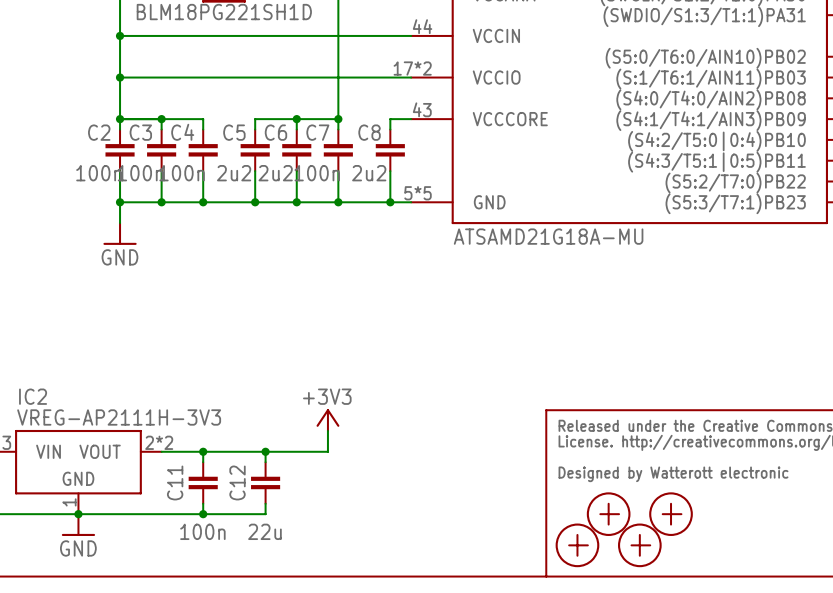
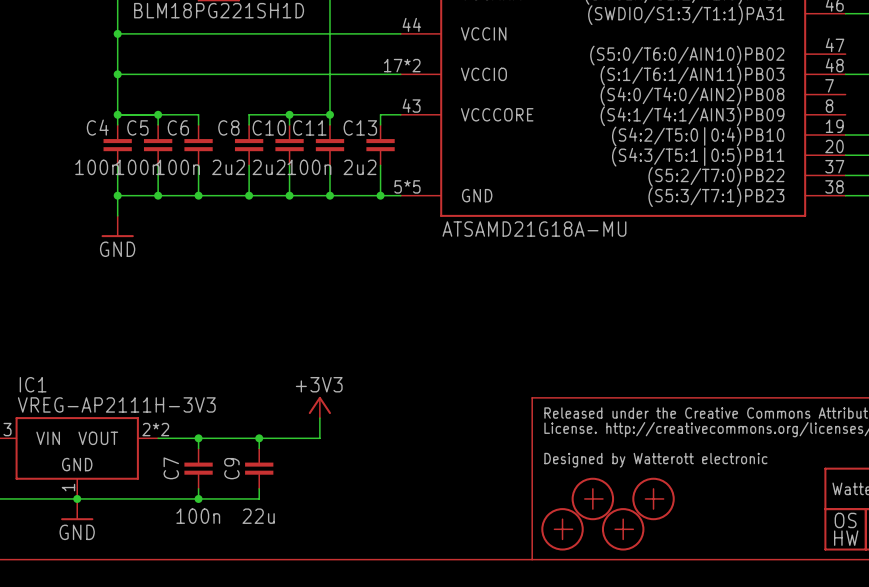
C2 name: C2 (99, 132) -> C4 (97, 127)
C3 name: C3 (140, 132) -> C5 (137, 127)
C4 name: C4 (182, 132) -> C6 (178, 127)
C5 name: C5 (234, 132) -> C8 (228, 127)
C6 name: C6 (275, 132) -> C10 (269, 127)
C7 name: C7 (317, 132) -> C11 (309, 127)
C8 name: C8 (369, 132) -> C13 (360, 127)
IC2 name: IC2 (33, 396) -> IC1 (33, 384)
C11 name: C11 (175, 482) -> C7 (171, 468)
C12 name: C12 (237, 482) -> C9 (231, 468)

